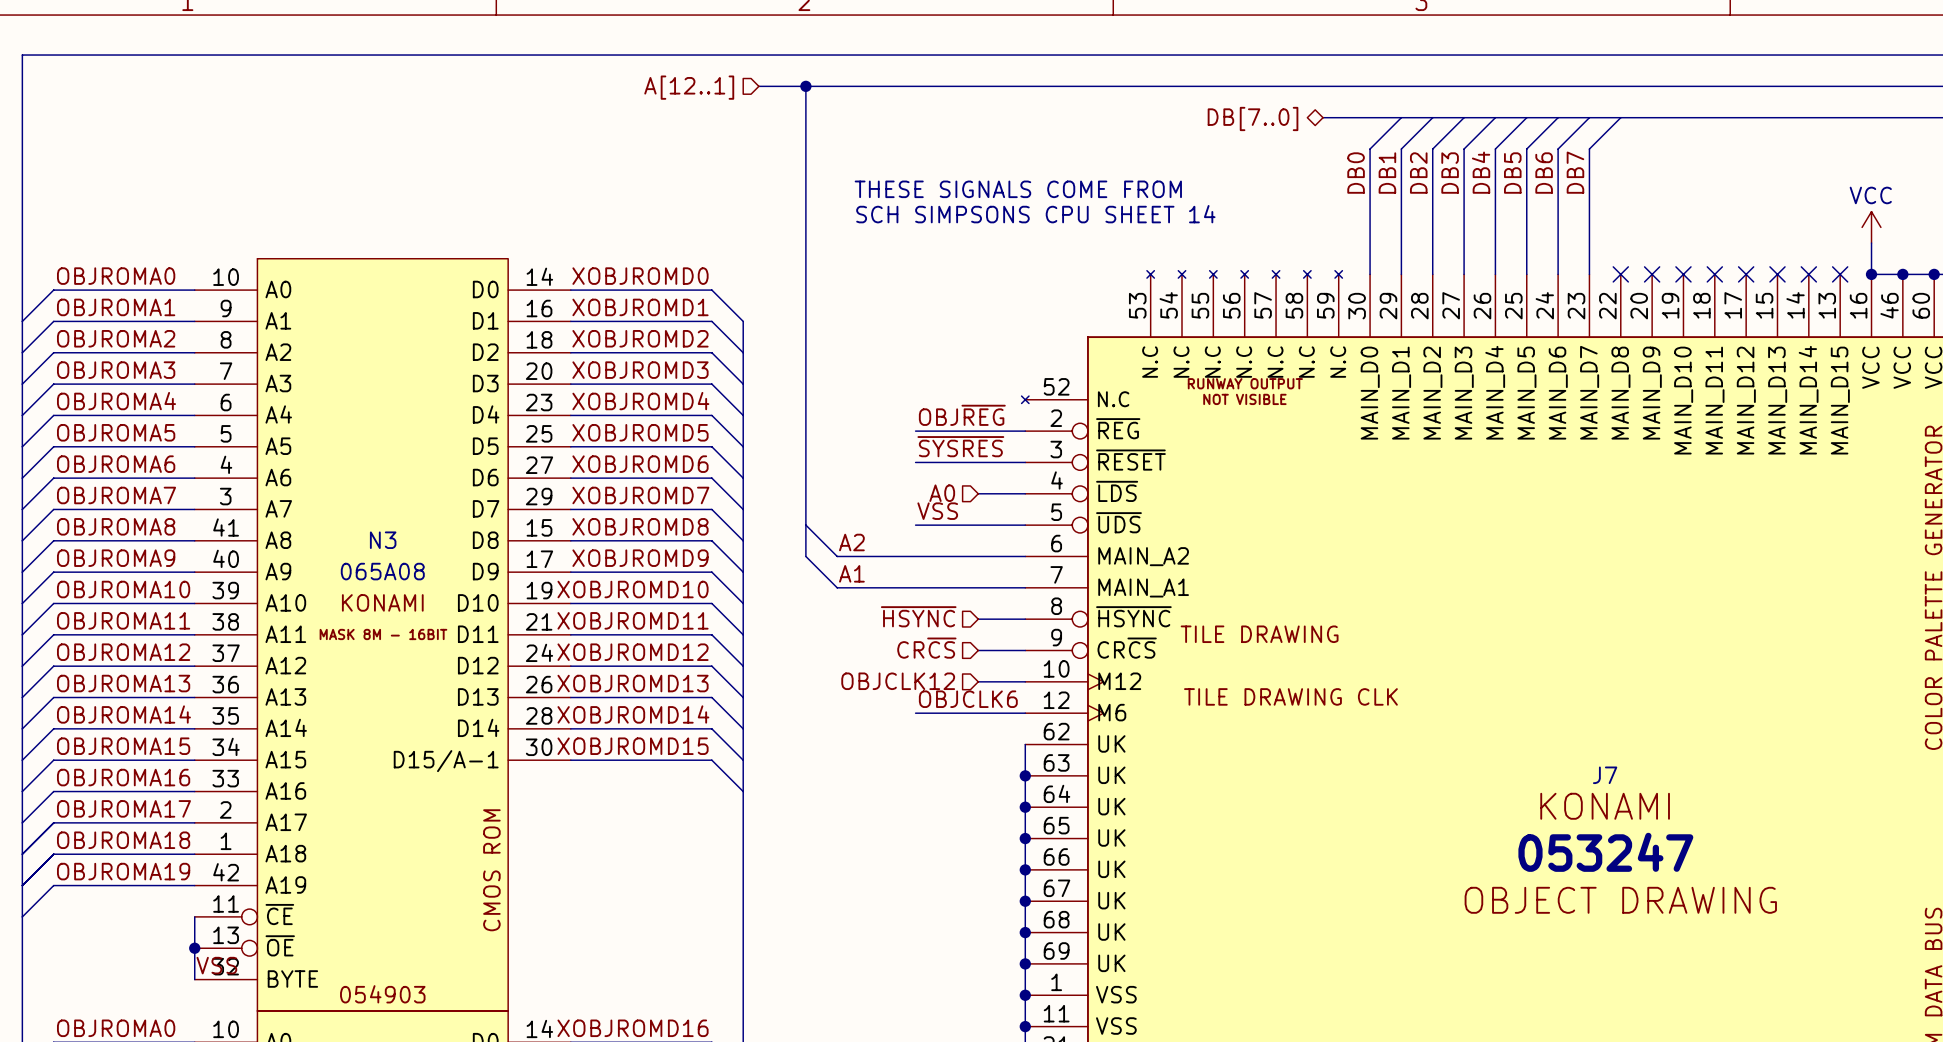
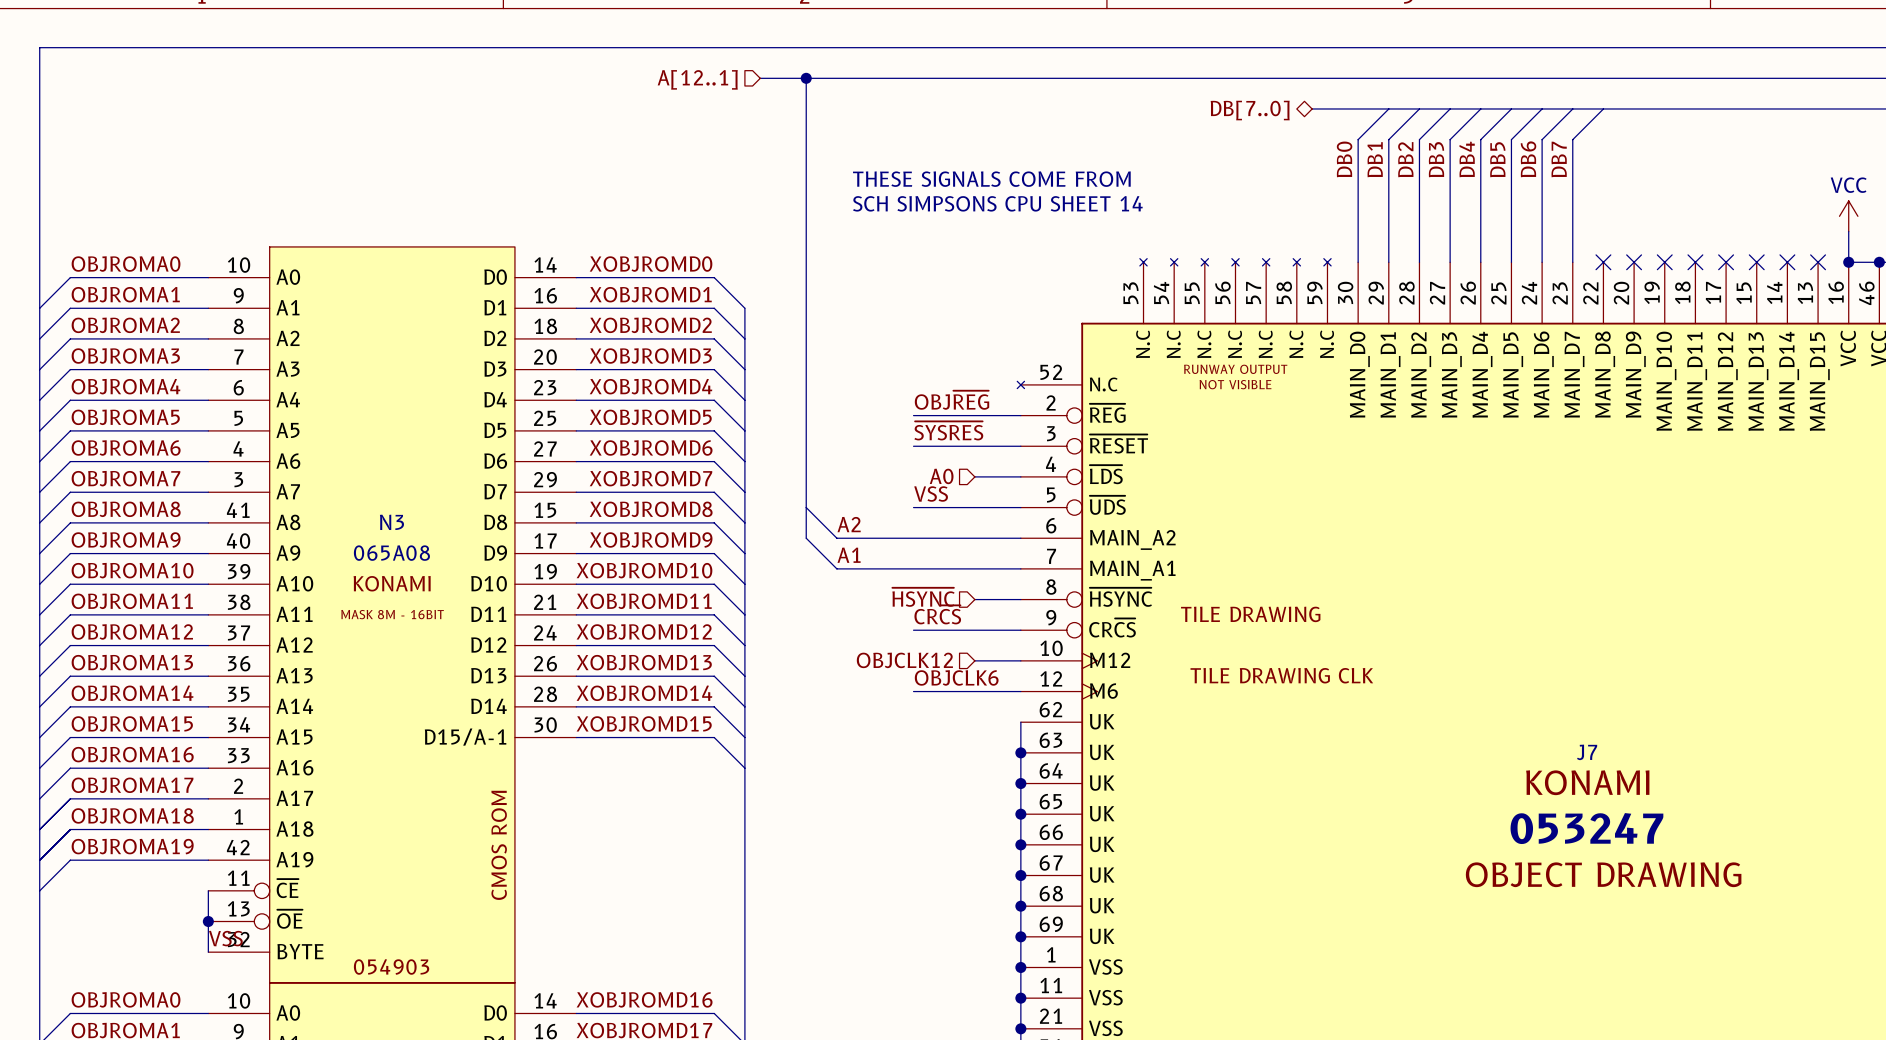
label: none -> CR~{CS} (937, 614)
hierarchical label: CR~{CS} (926, 648) -> none
wire: none -> (913, 630) (974, 630)

